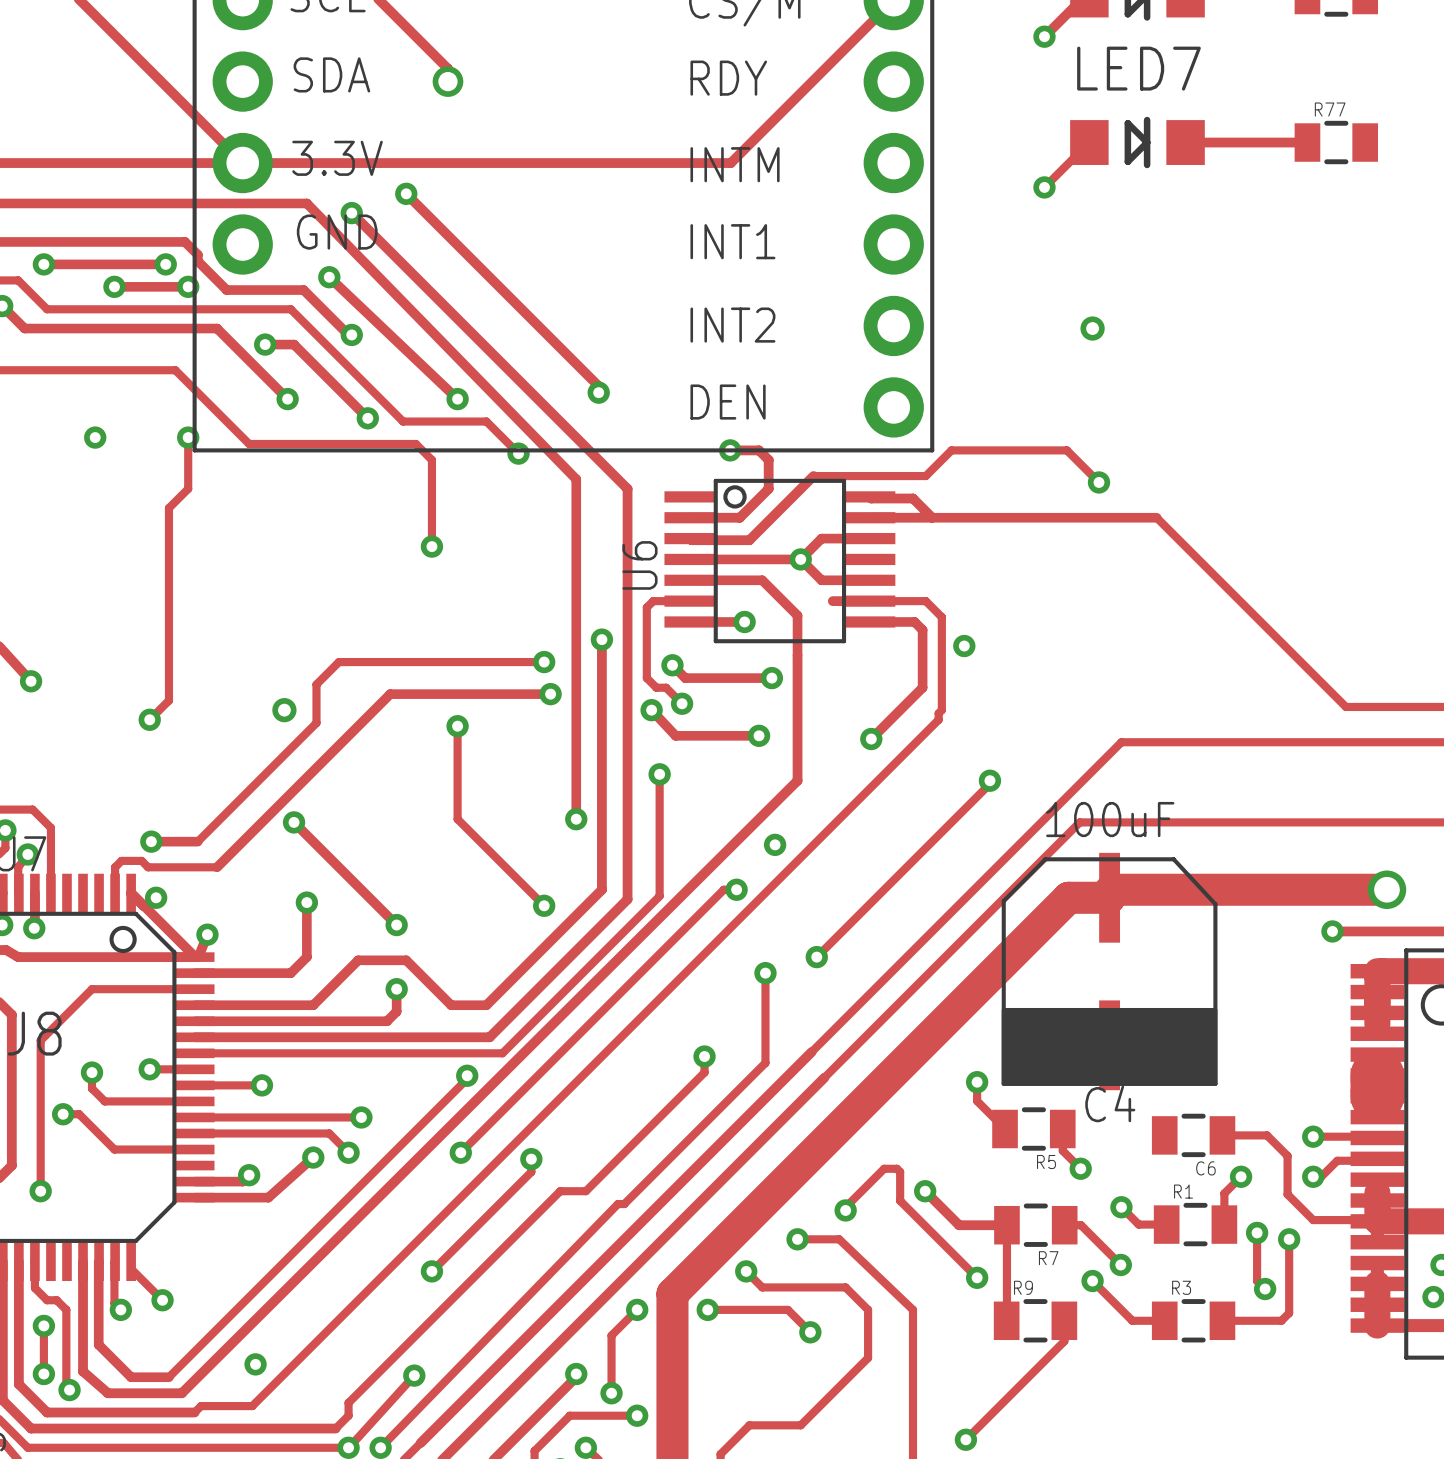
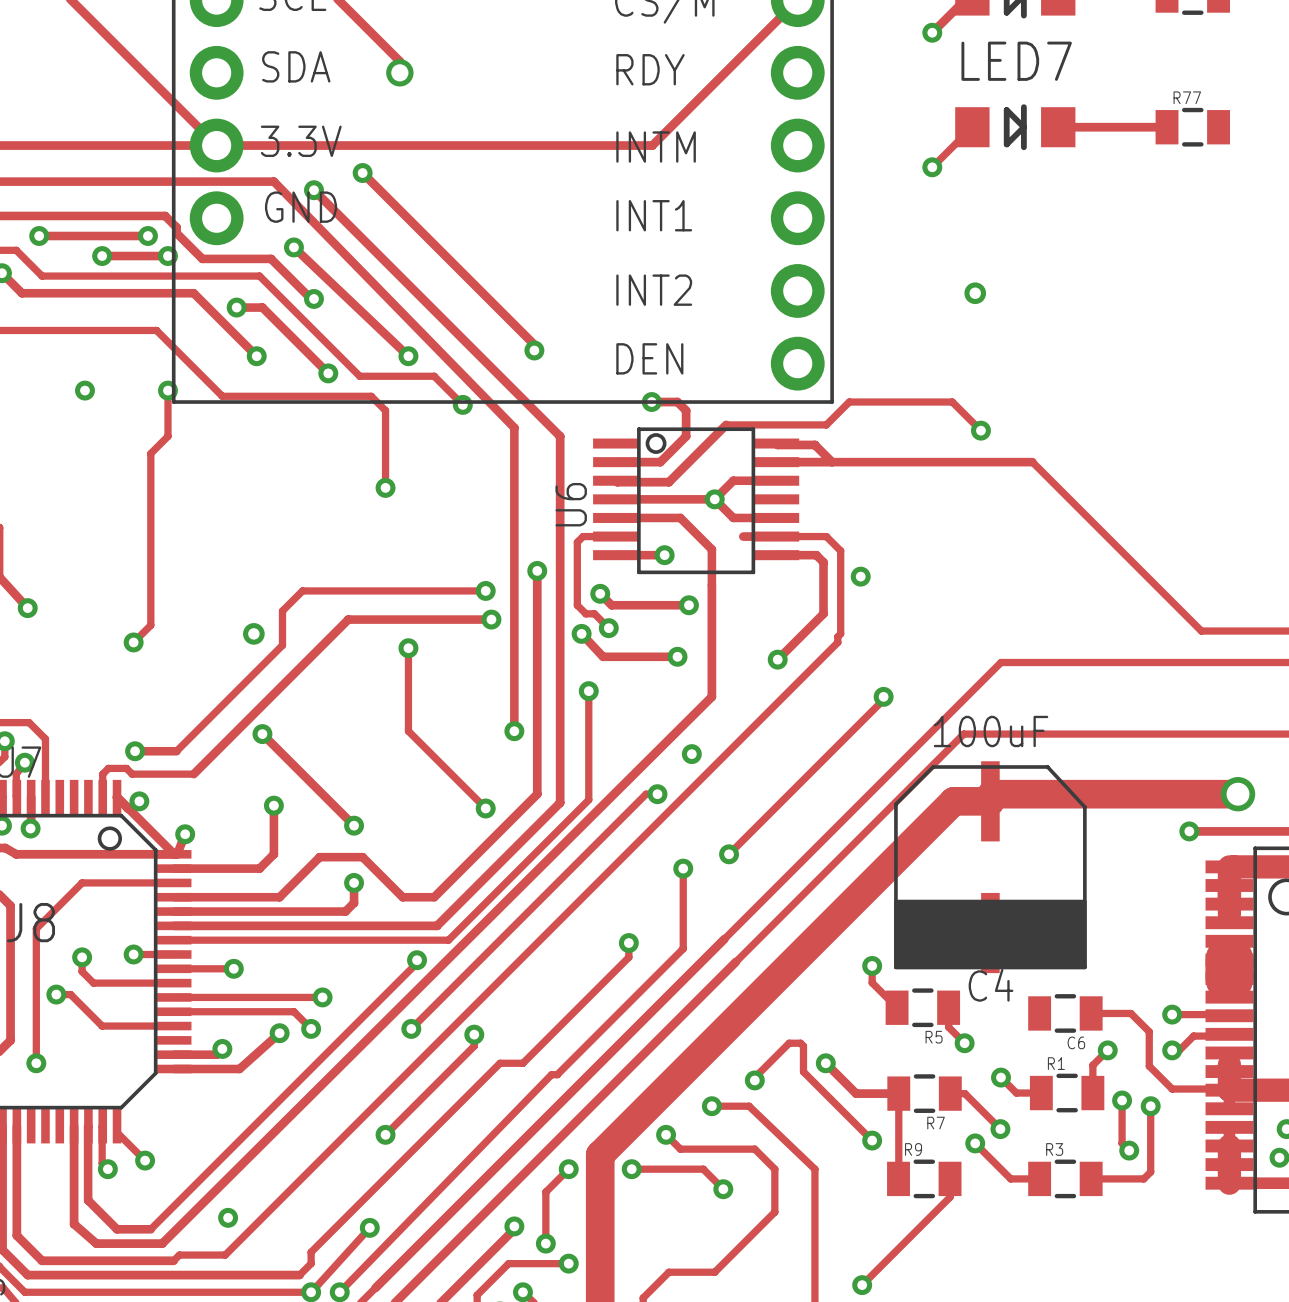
track: (34, 1261) (34, 1288) (47, 1300) (56, 1300) (66, 1309) (66, 1386) (69, 1390) -> none
track: (43, 1325) (43, 1374) -> none
via: (43, 1325) -> none
via: (43, 1374) -> none
via: (69, 1390) -> none

